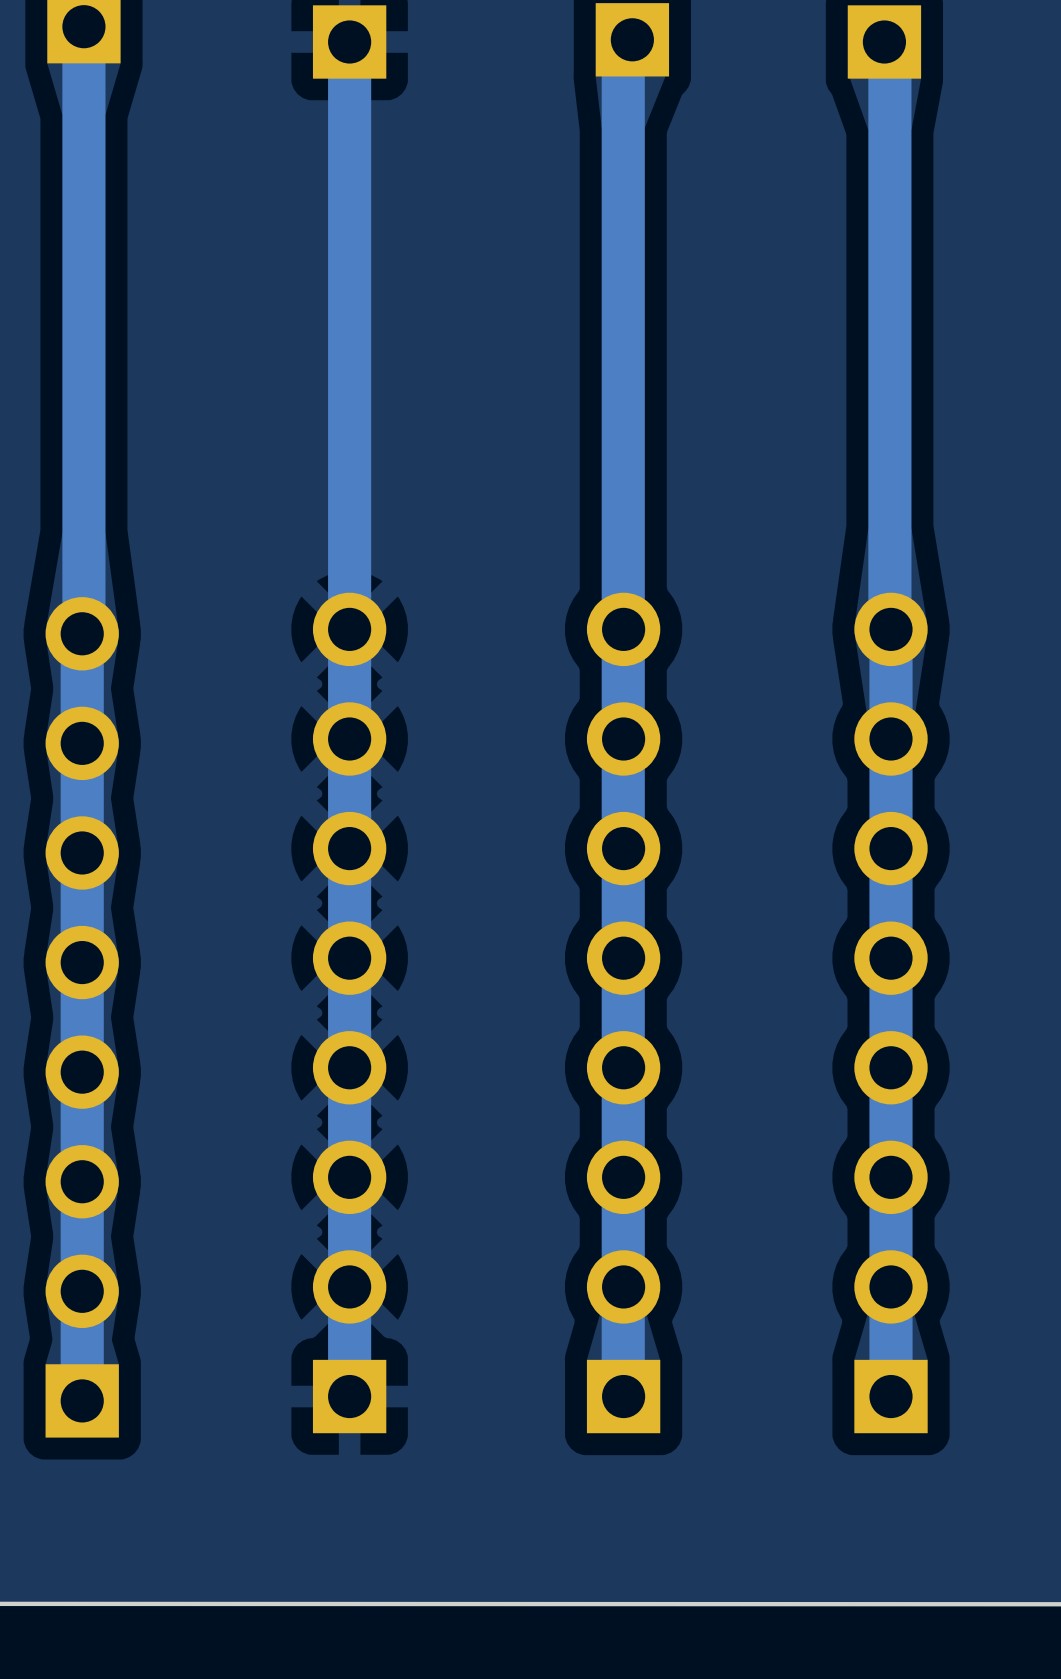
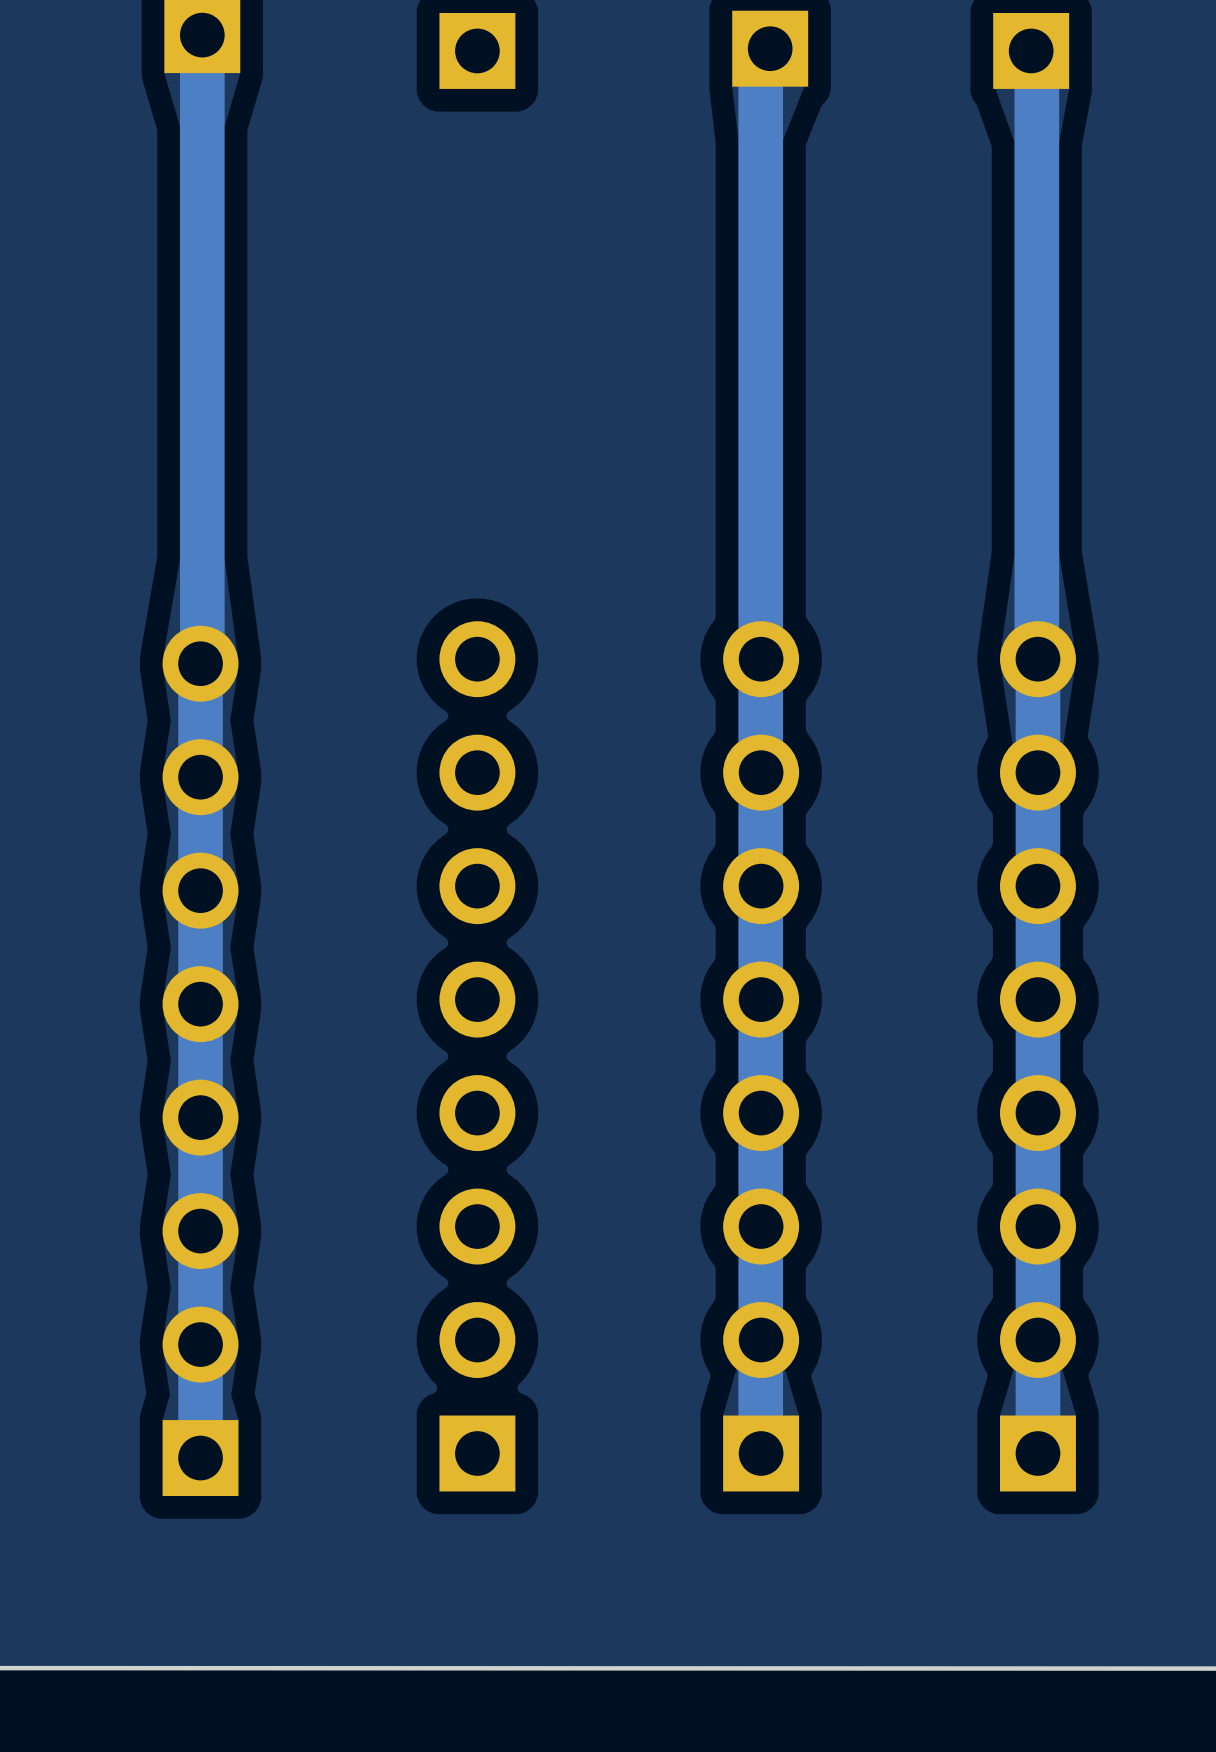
track: (349, 41) (349, 1396) -> none

